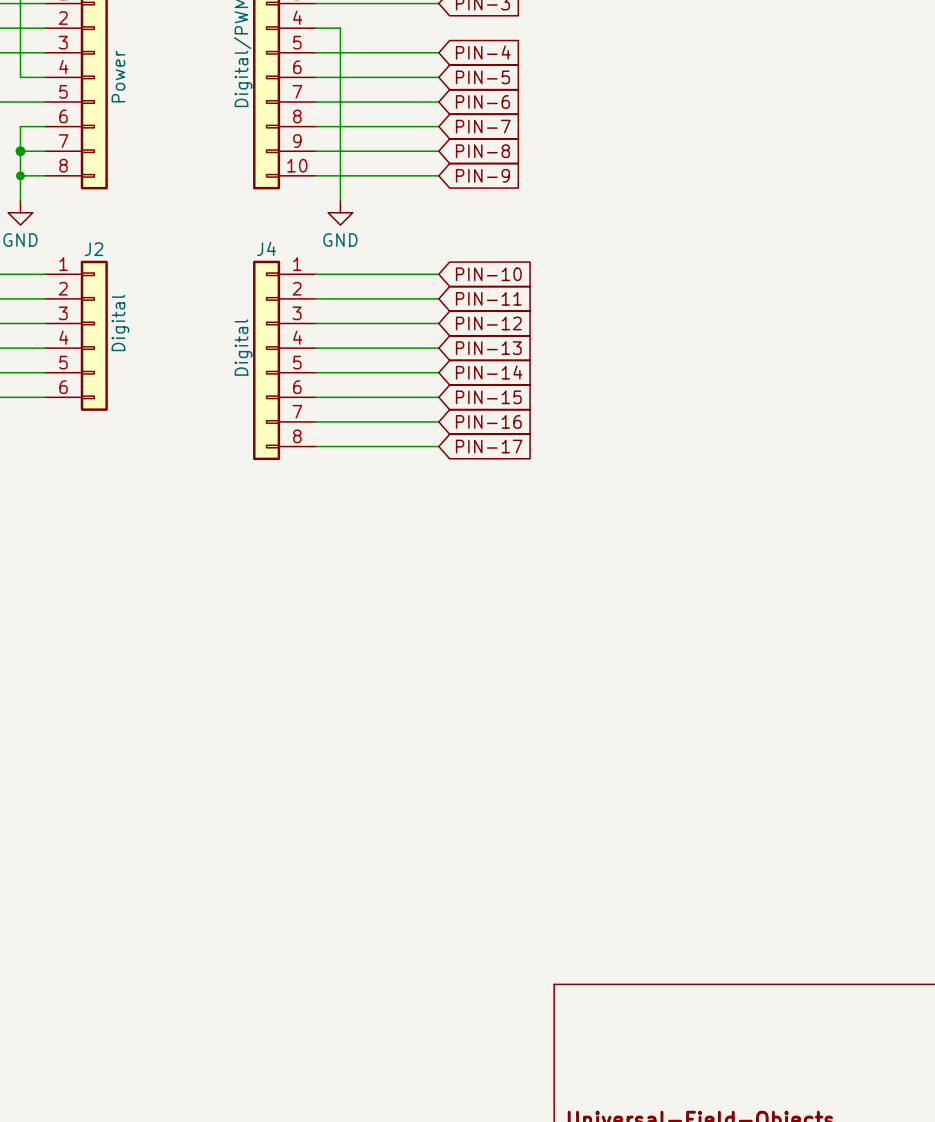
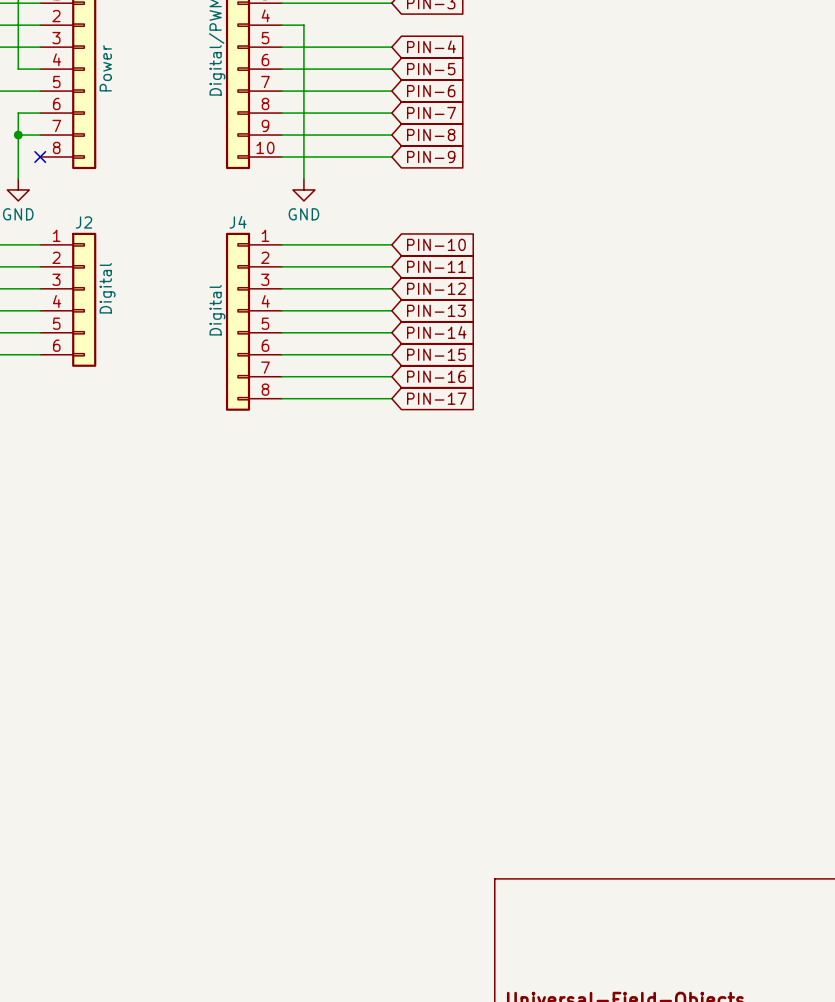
wire: (20, 175) (45, 175) -> none
junction: (20, 175) -> none
no-connect mark: none -> (40, 156)

